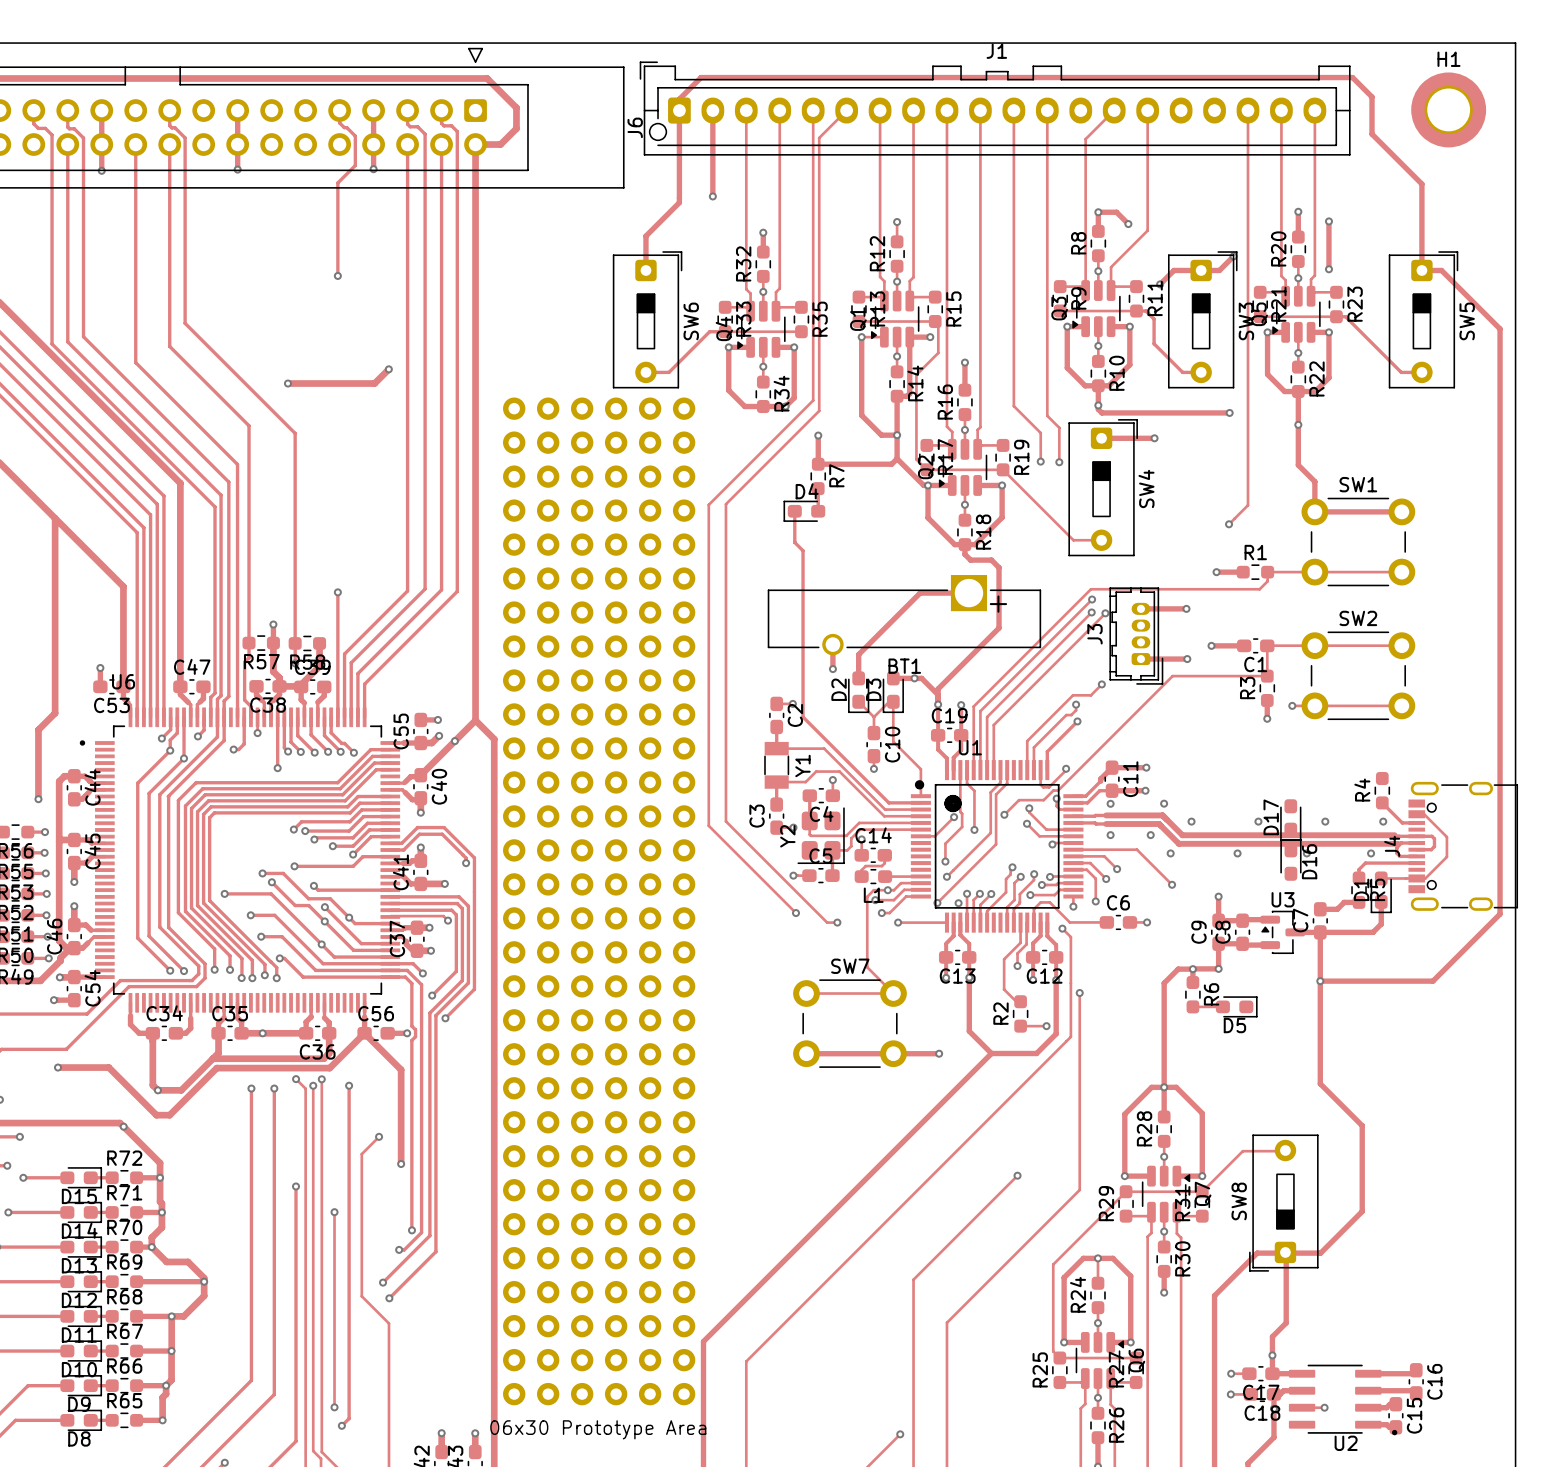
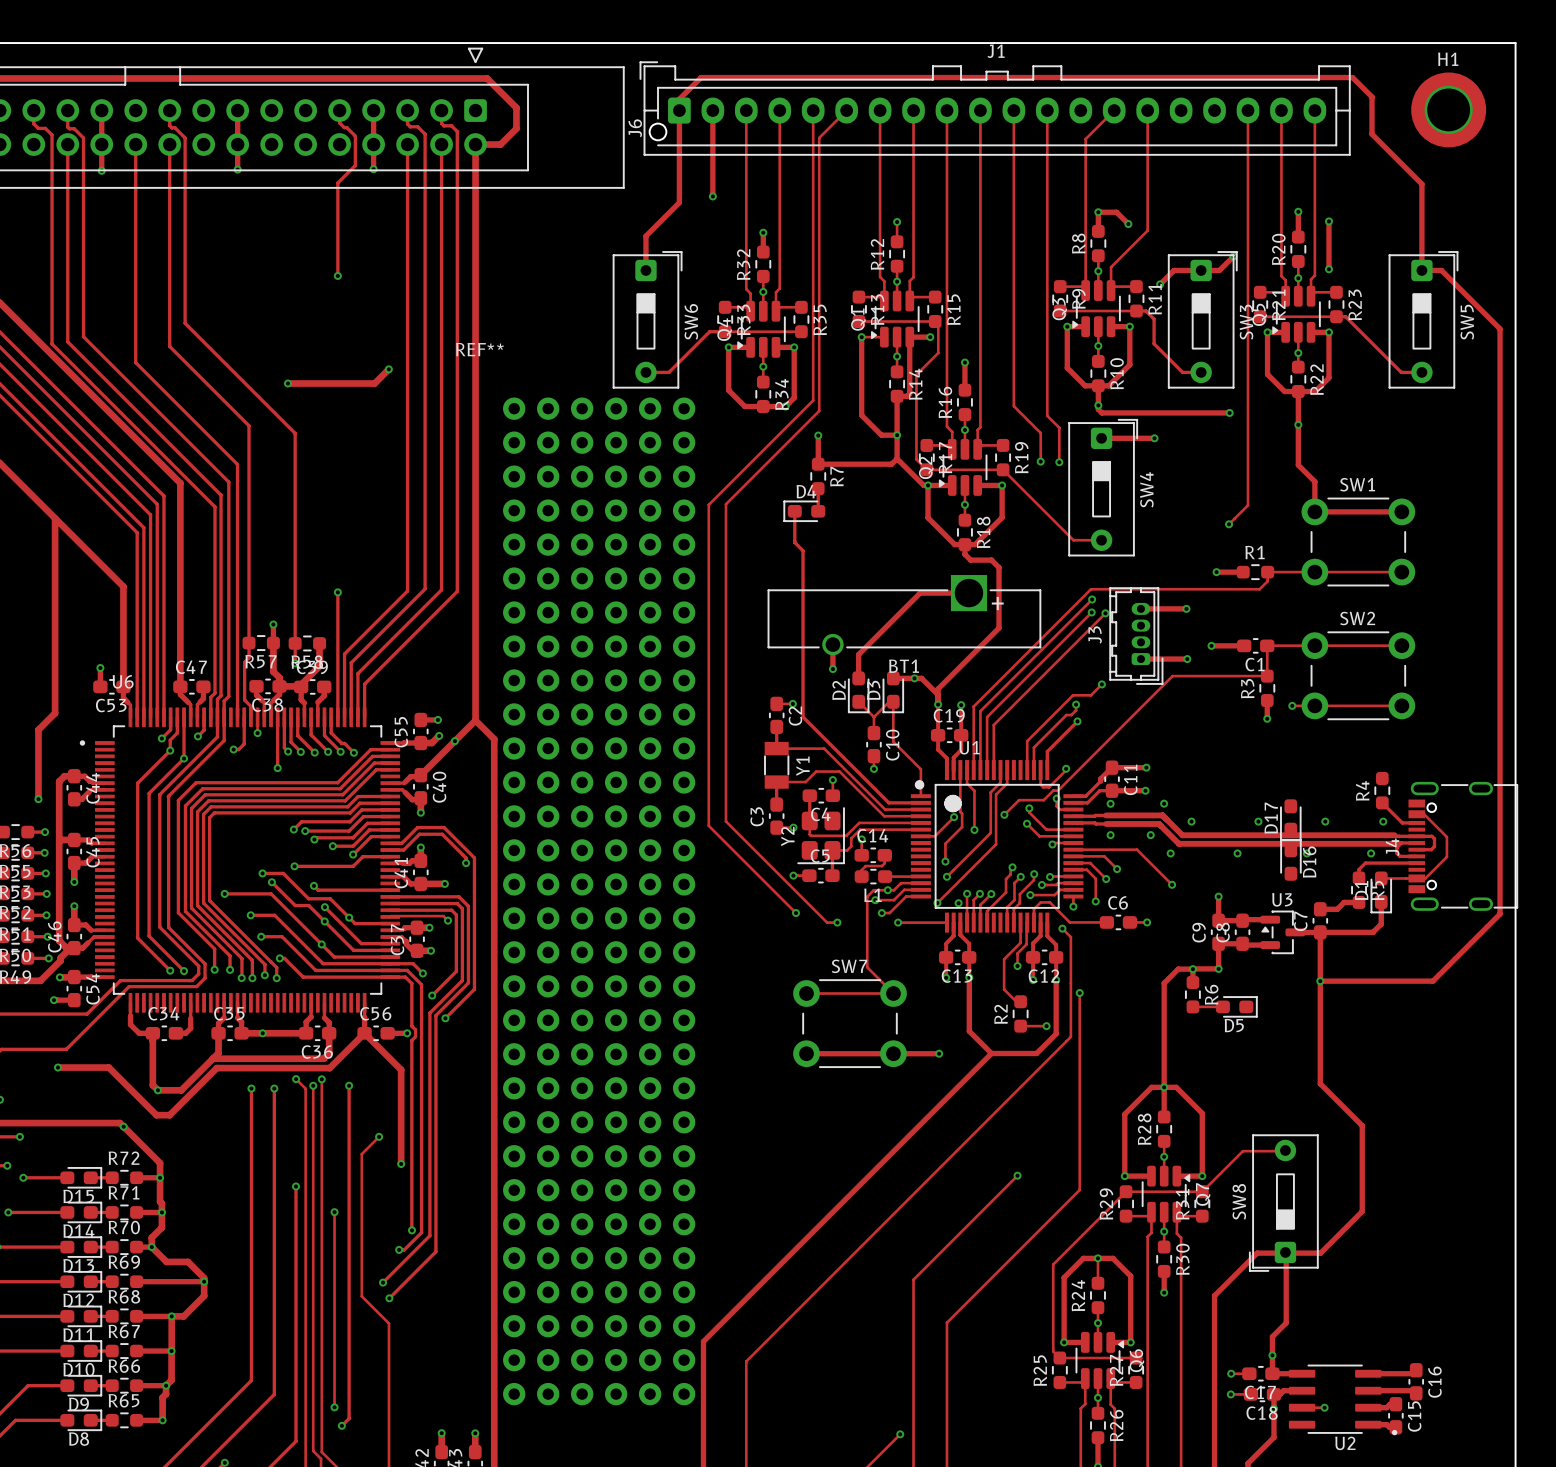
06x30 Prototype Area name: 06x30 Prototype Area (598, 1429) -> REF** (479, 349)

